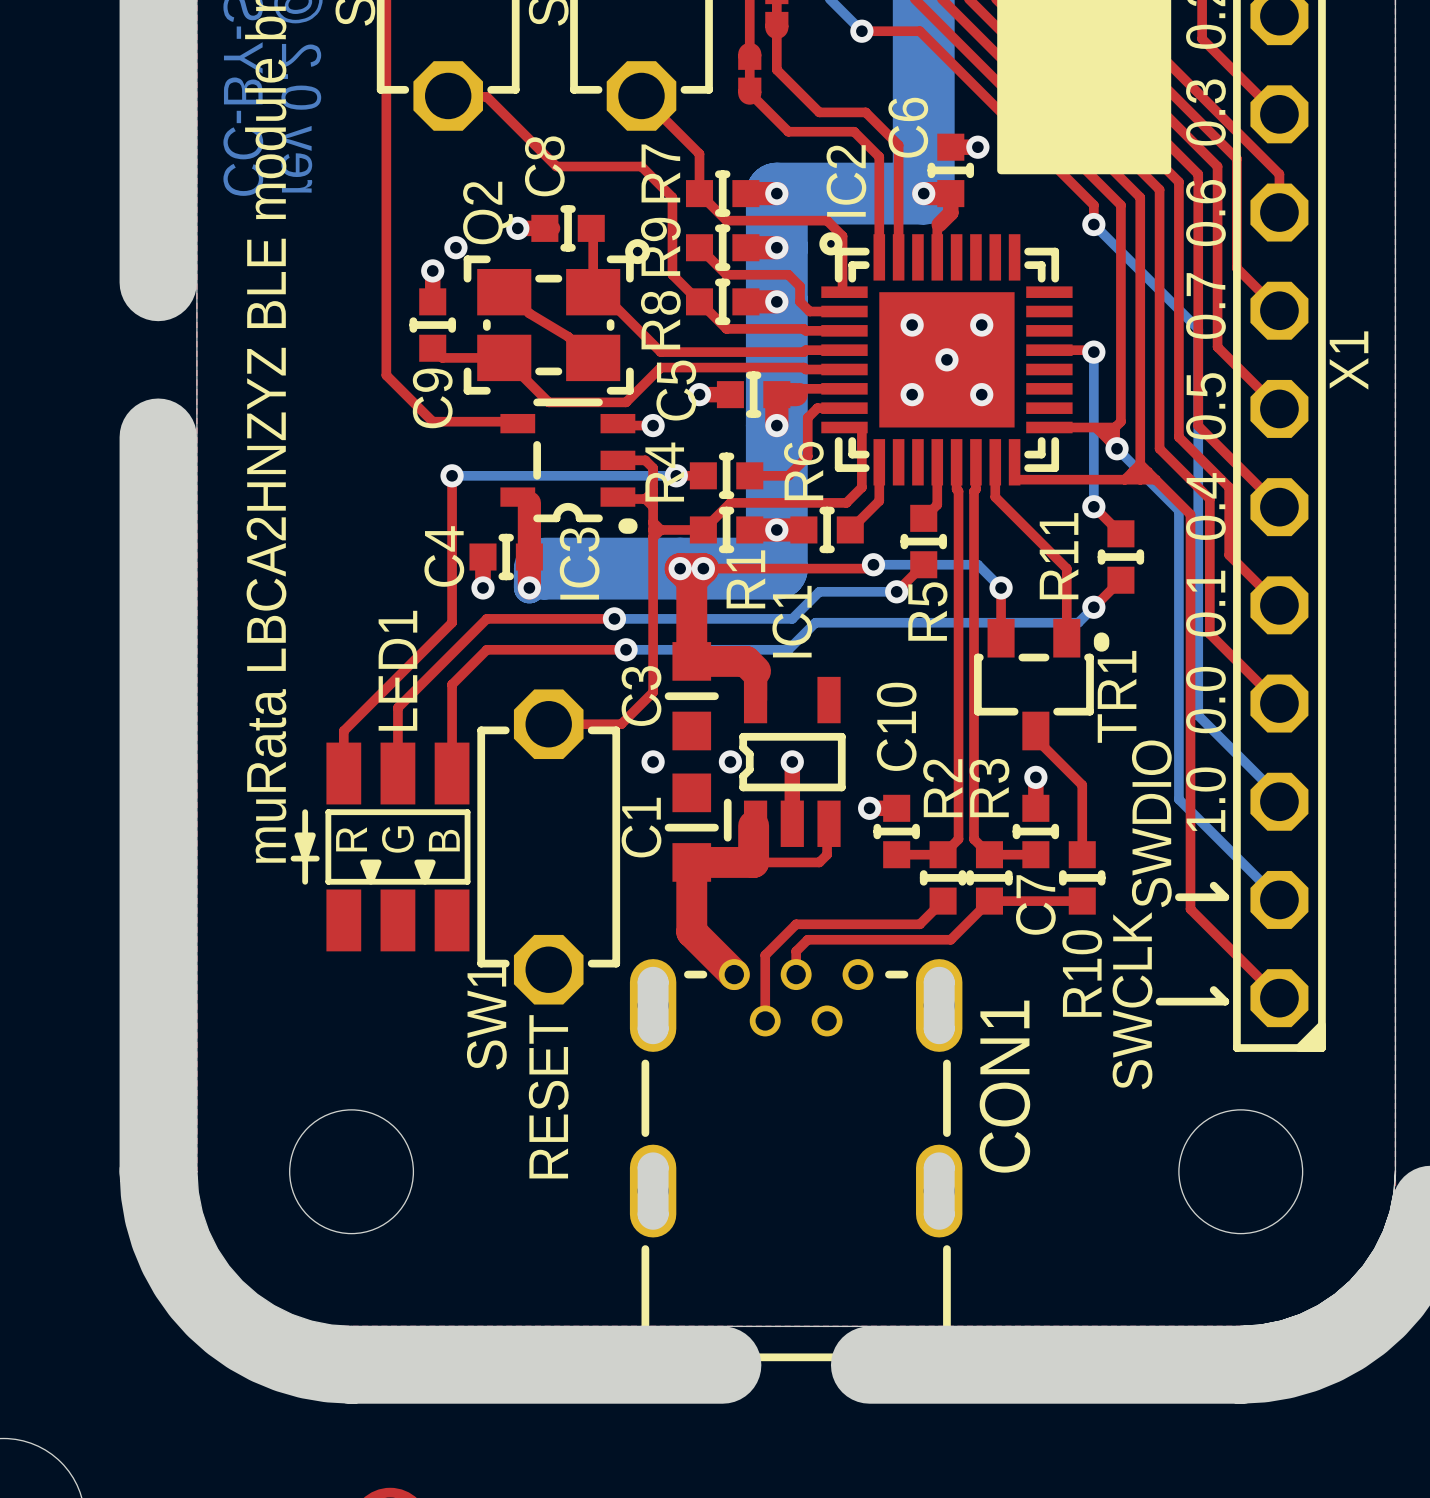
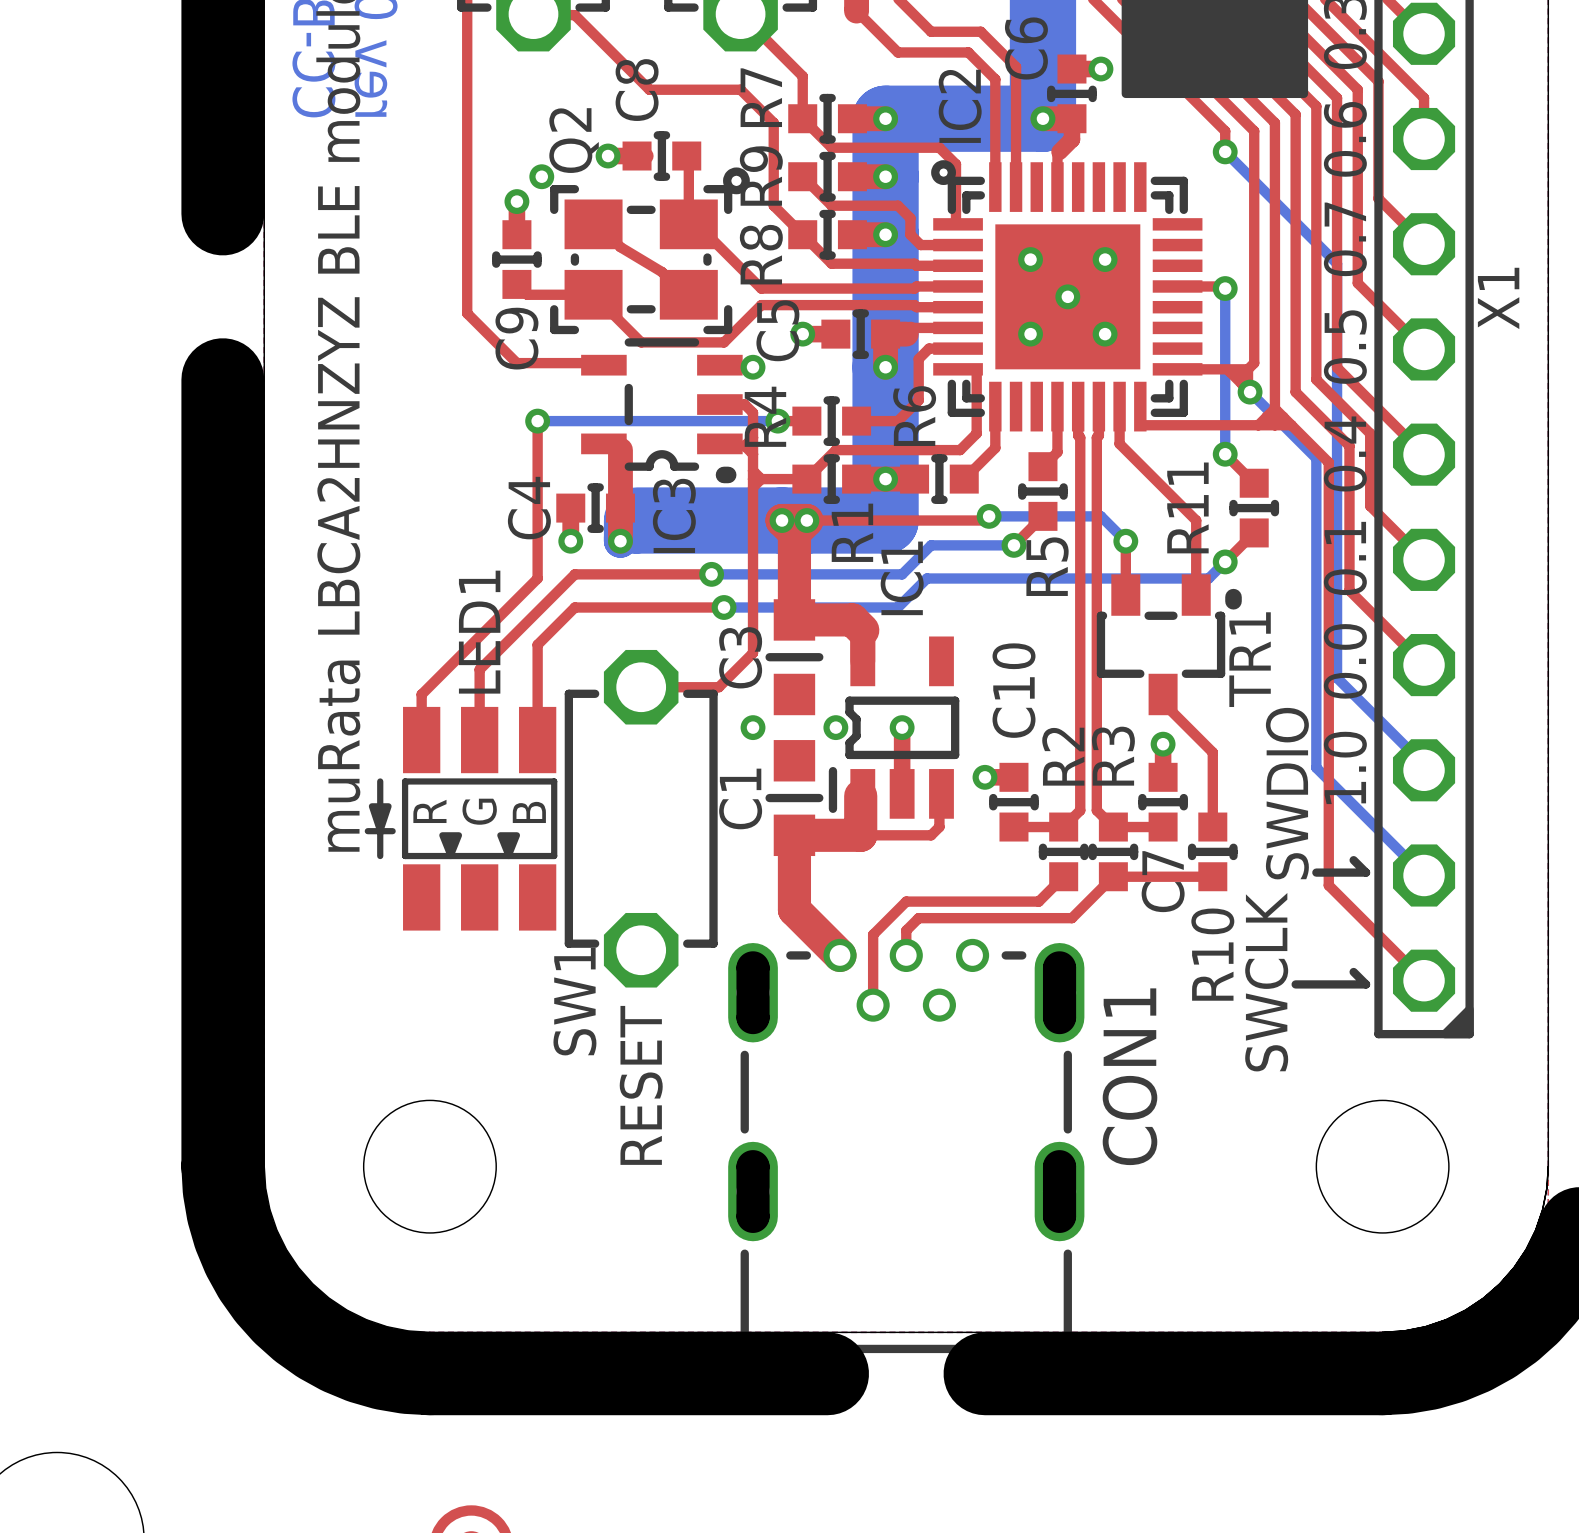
IC3 footprint: [500, 398, 638, 534] -> [581, 338, 743, 484]
CON1 footprint: [629, 959, 963, 1362] -> [728, 938, 1085, 1354]

